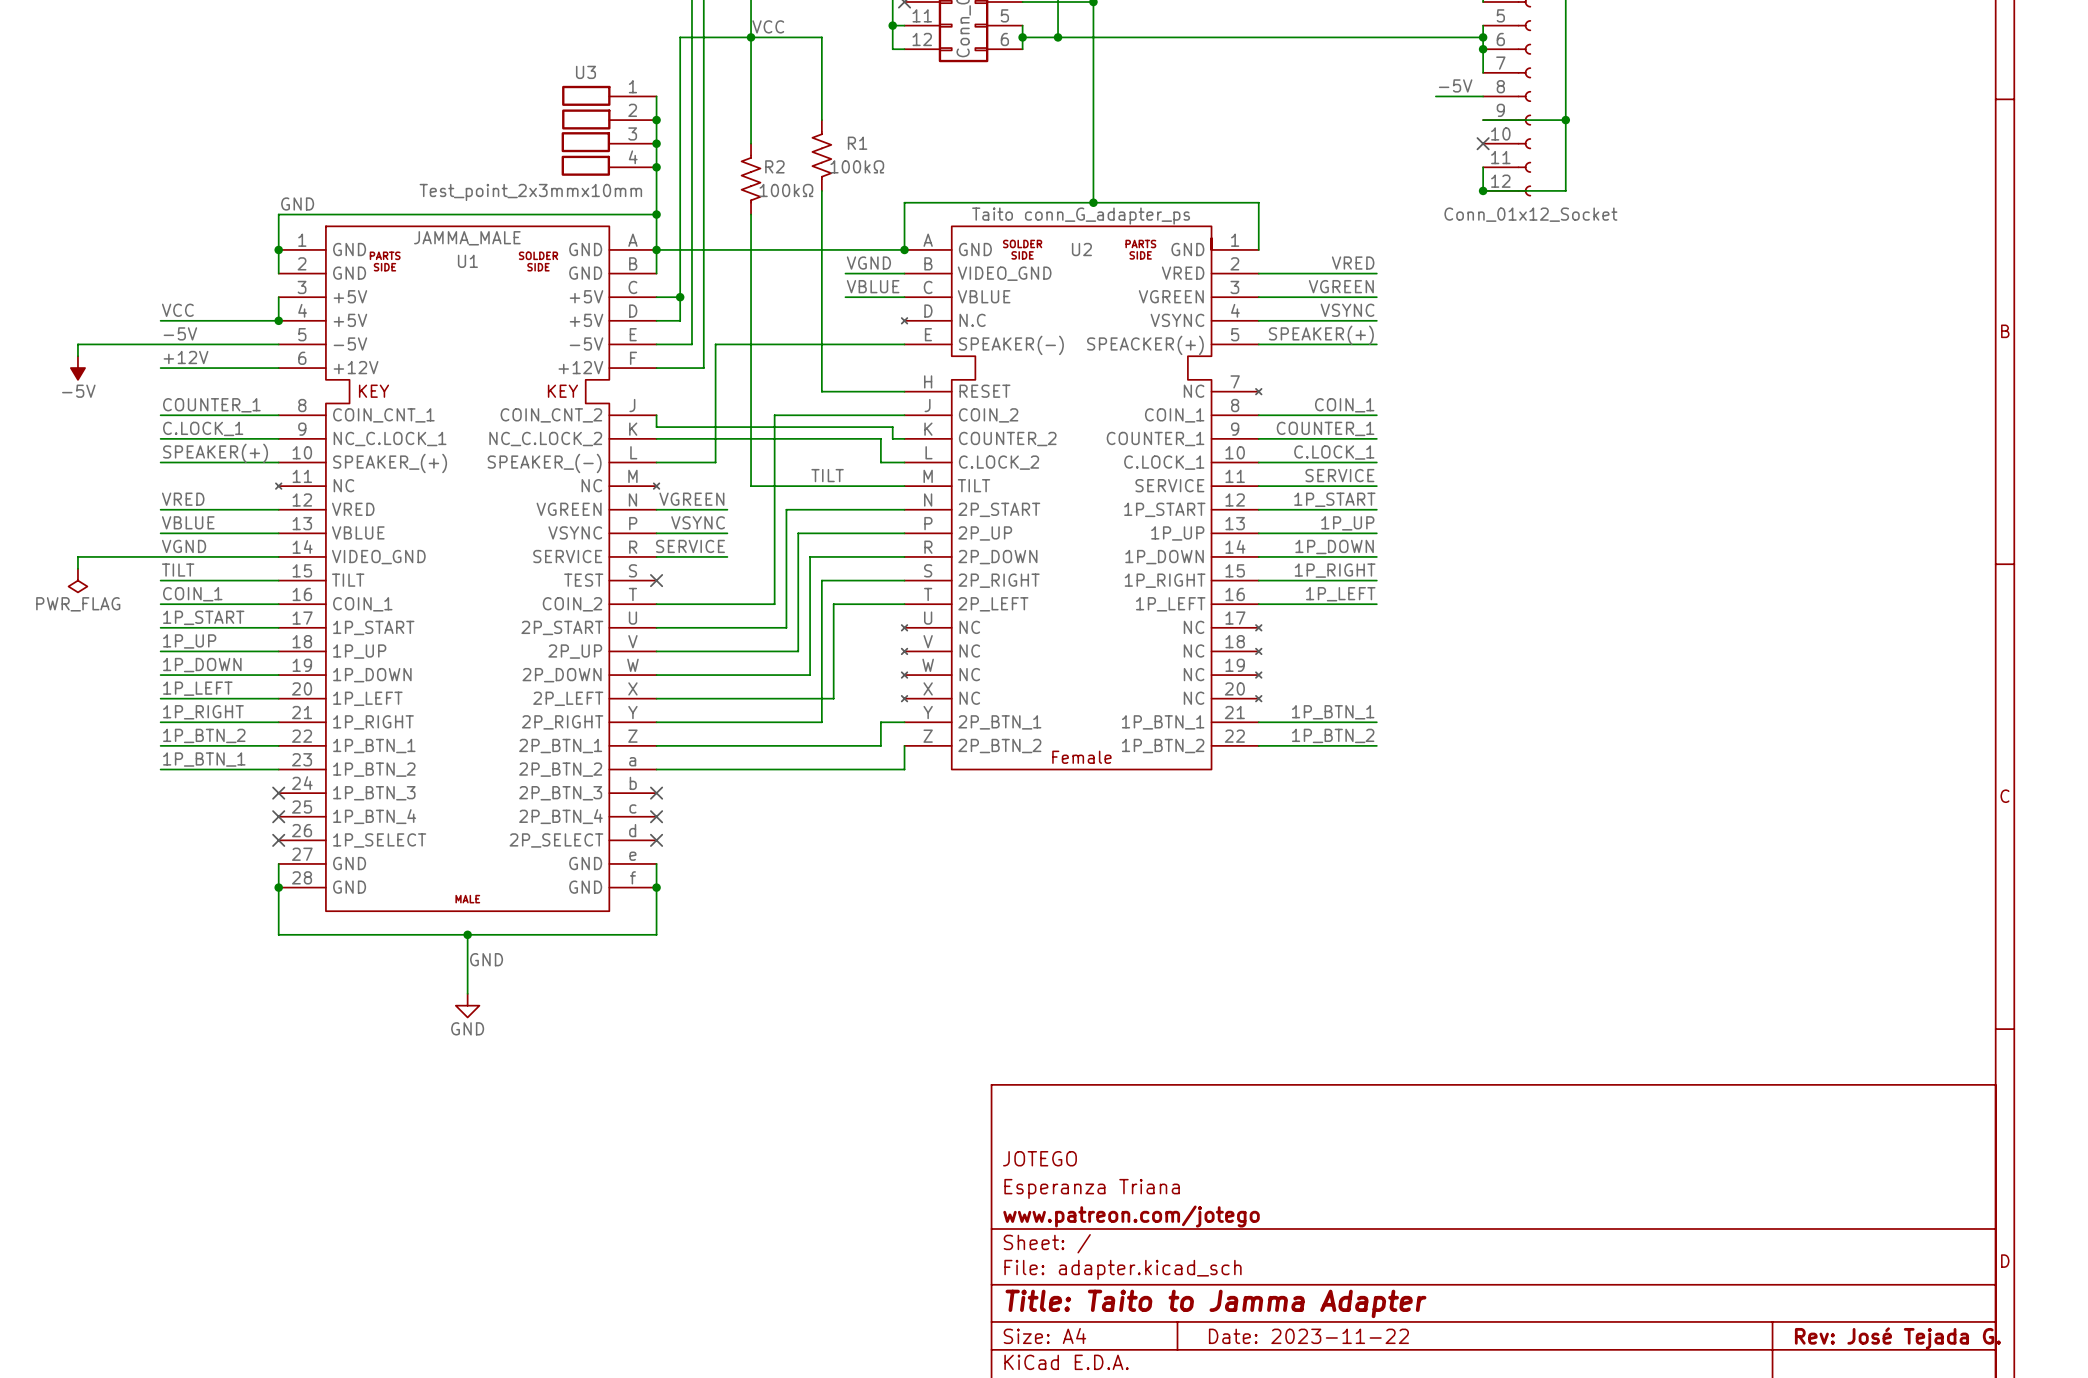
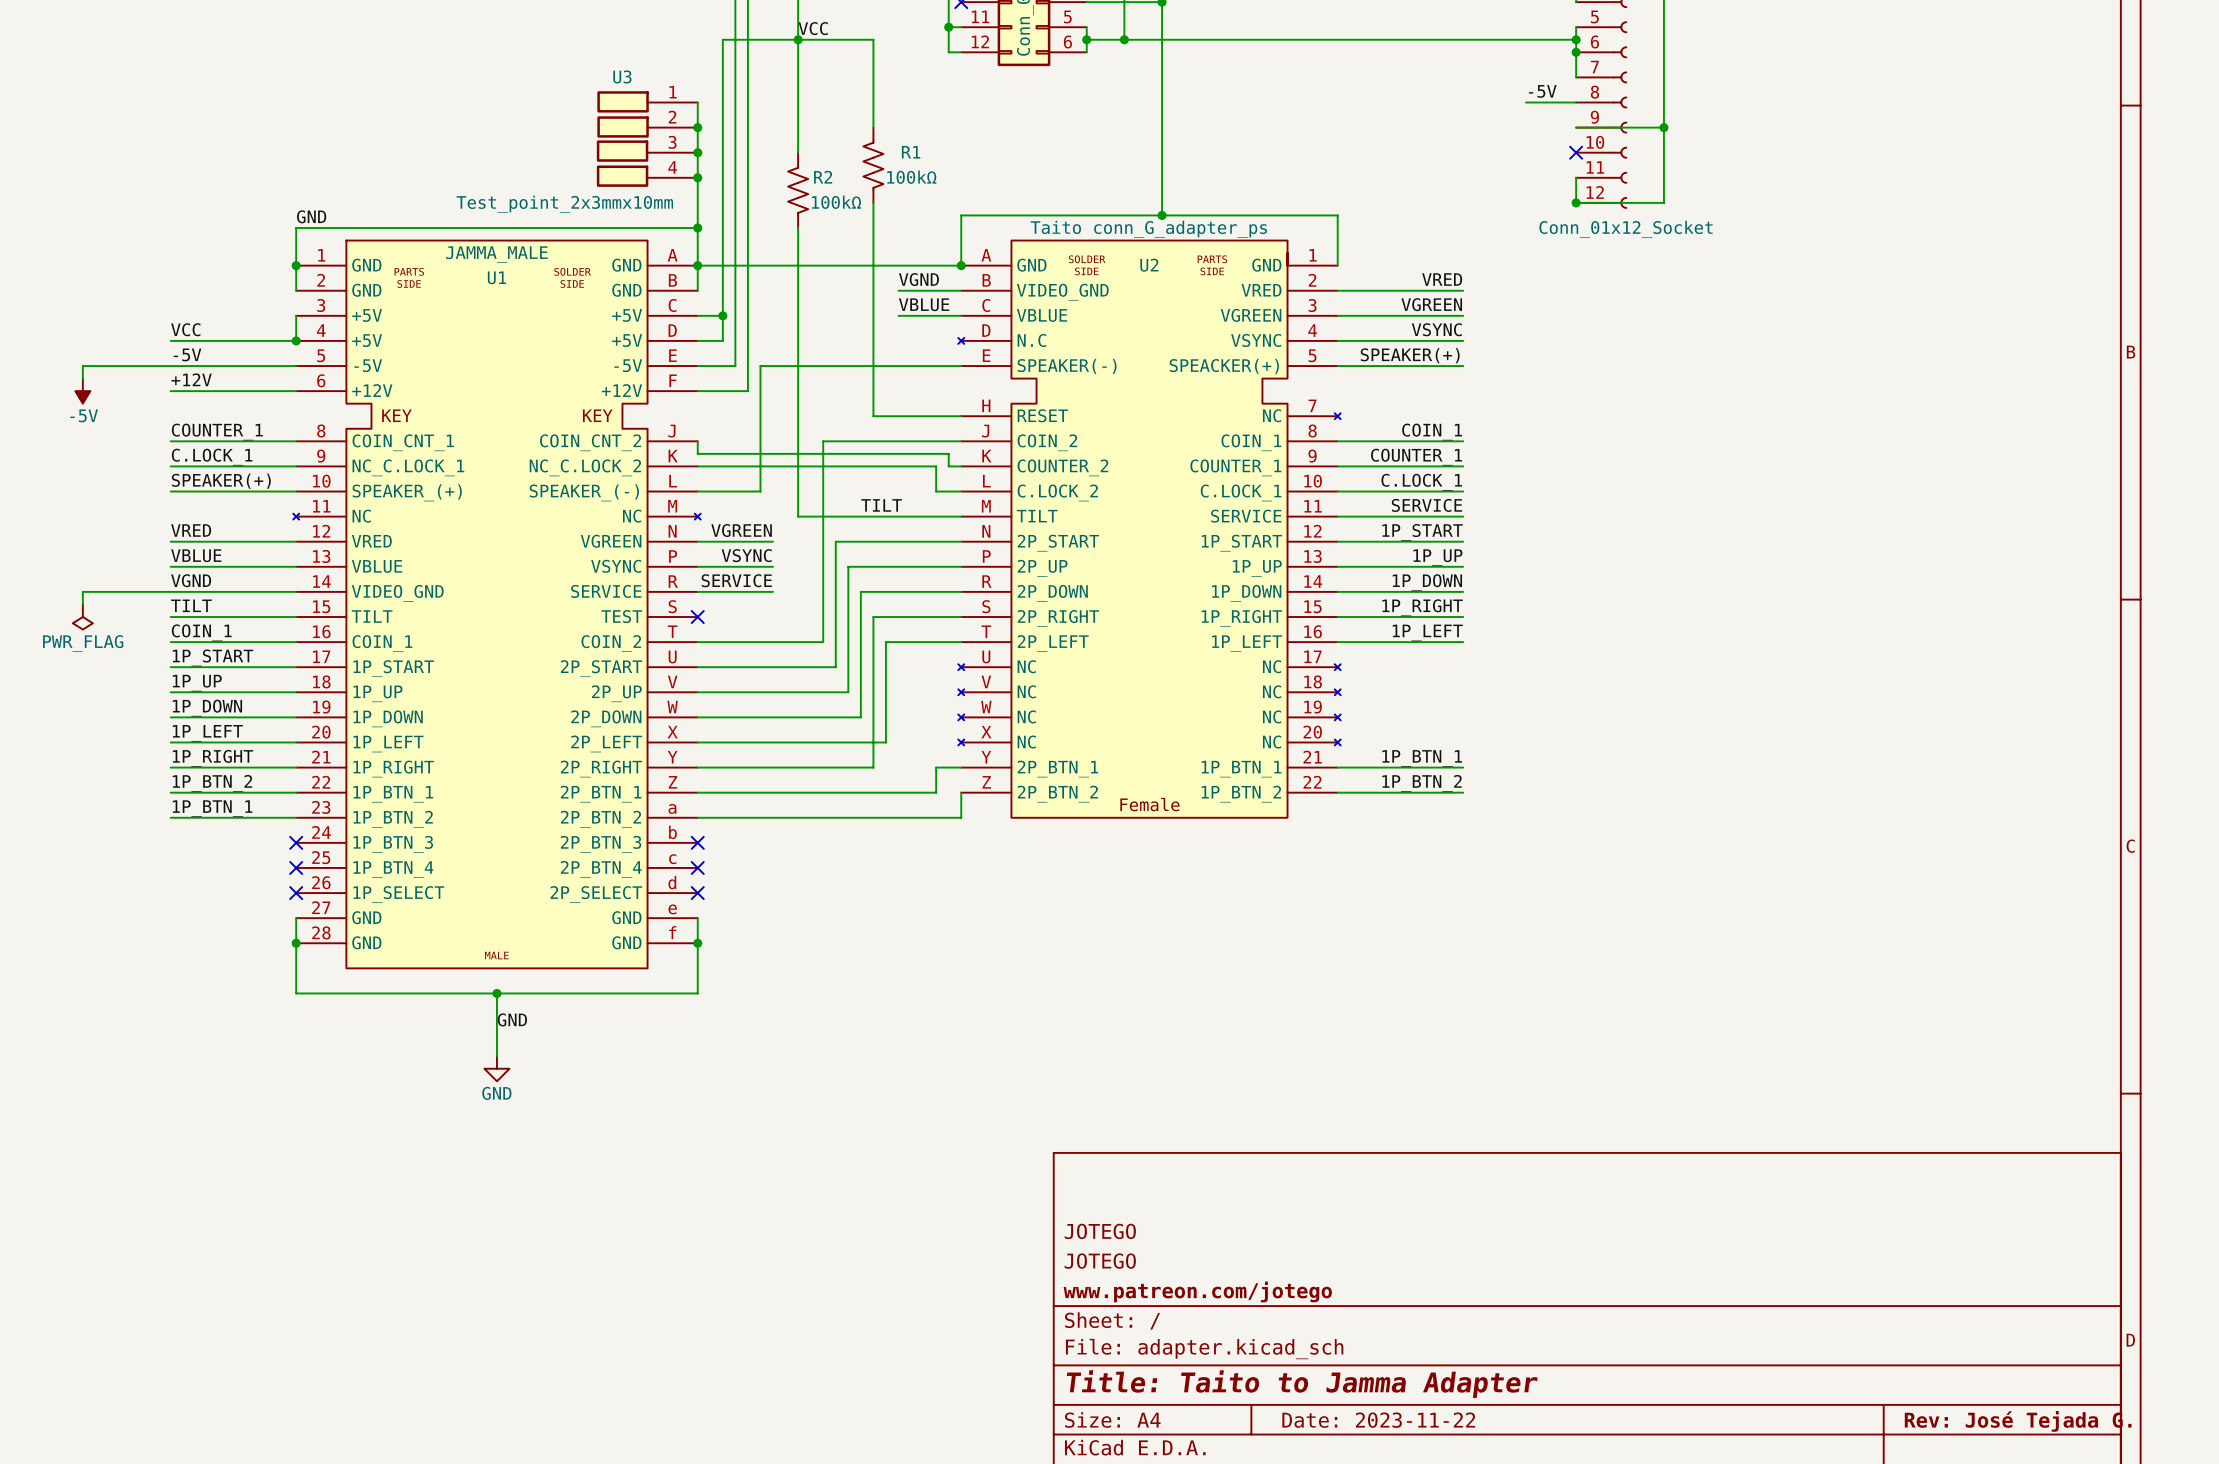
title block: Esperanza Triana (1092, 1188) -> JOTEGO (1100, 1261)

